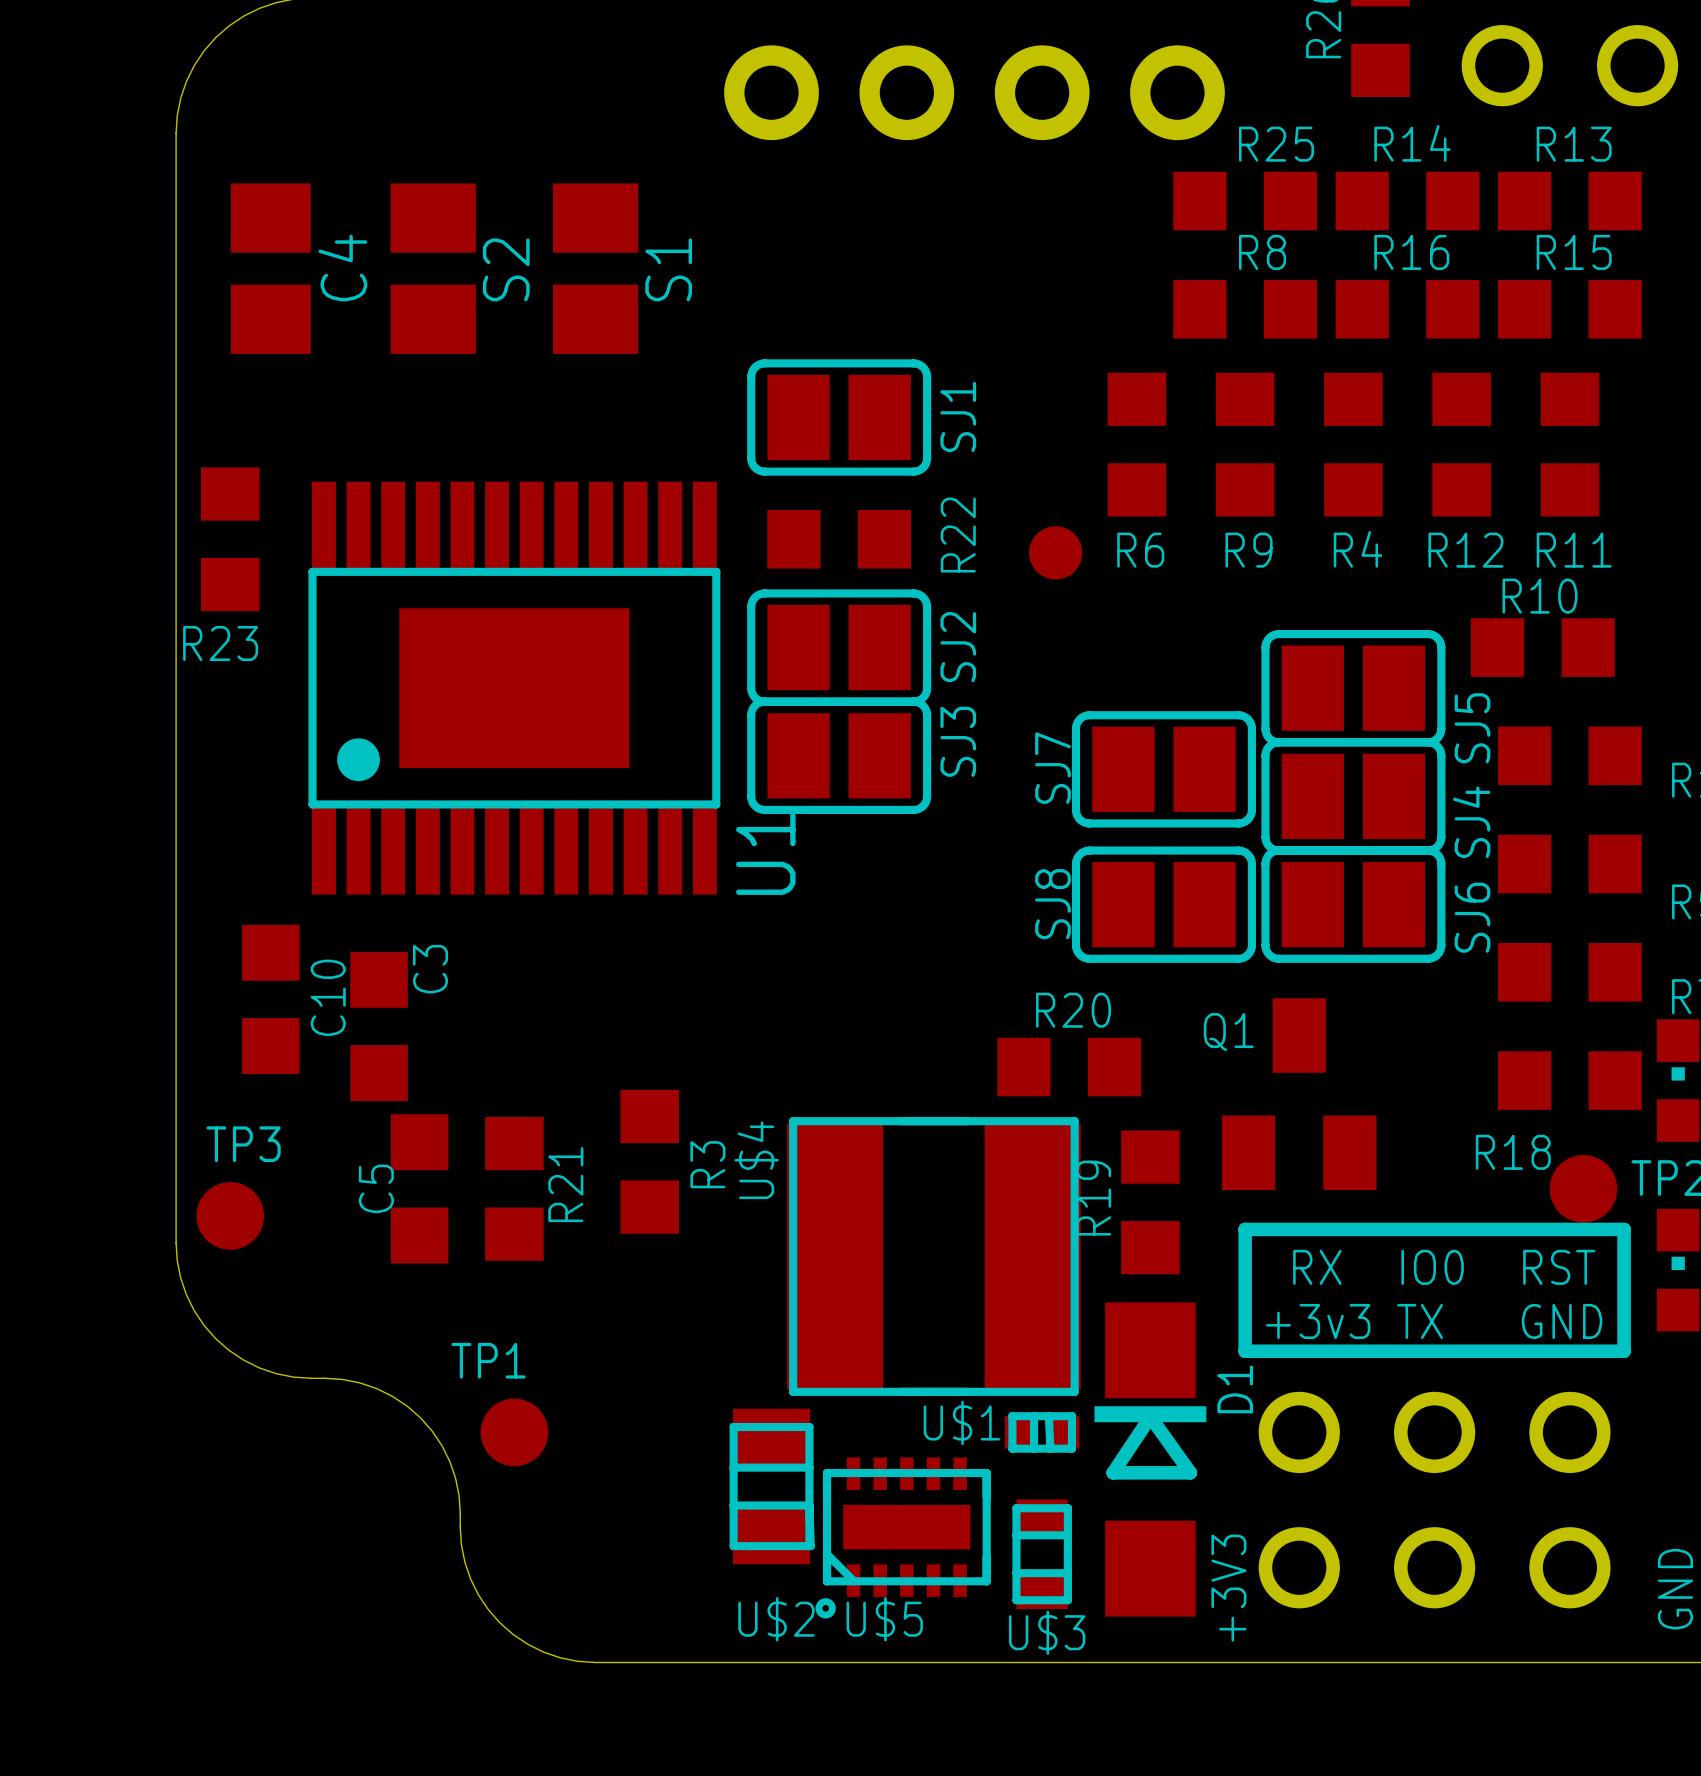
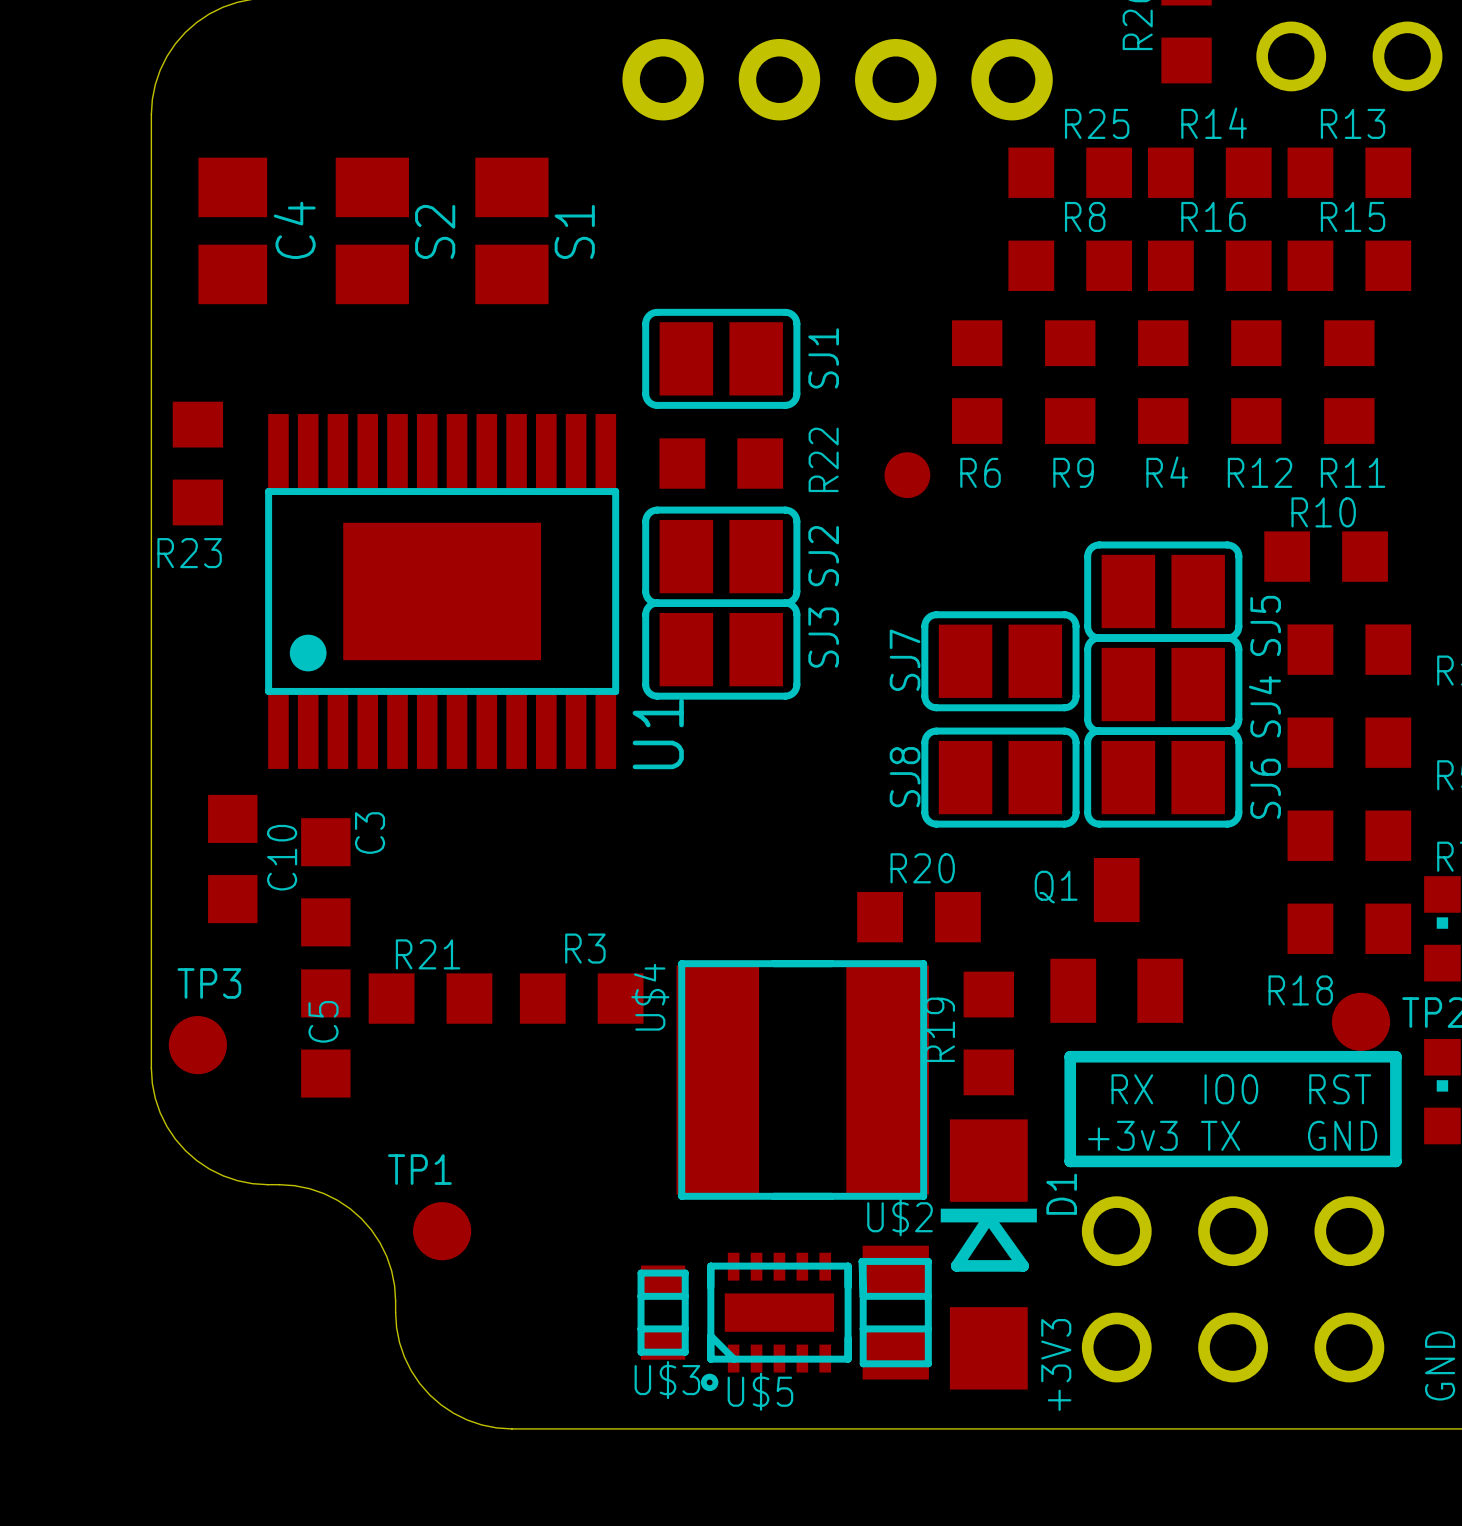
R3 rotation: 0° (649, 1161) -> 90° clockwise (581, 998)
part position: (419, 1188) -> (325, 1033)
R21 rotation: 0° (514, 1188) -> 90° clockwise (430, 998)
U$1: (1042, 1432) -> none
U$2 rotation: 0° (772, 1486) -> 180° (895, 1312)
U$2 position: (772, 1486) -> (895, 1312)
U$3 position: (1042, 1554) -> (663, 1312)

